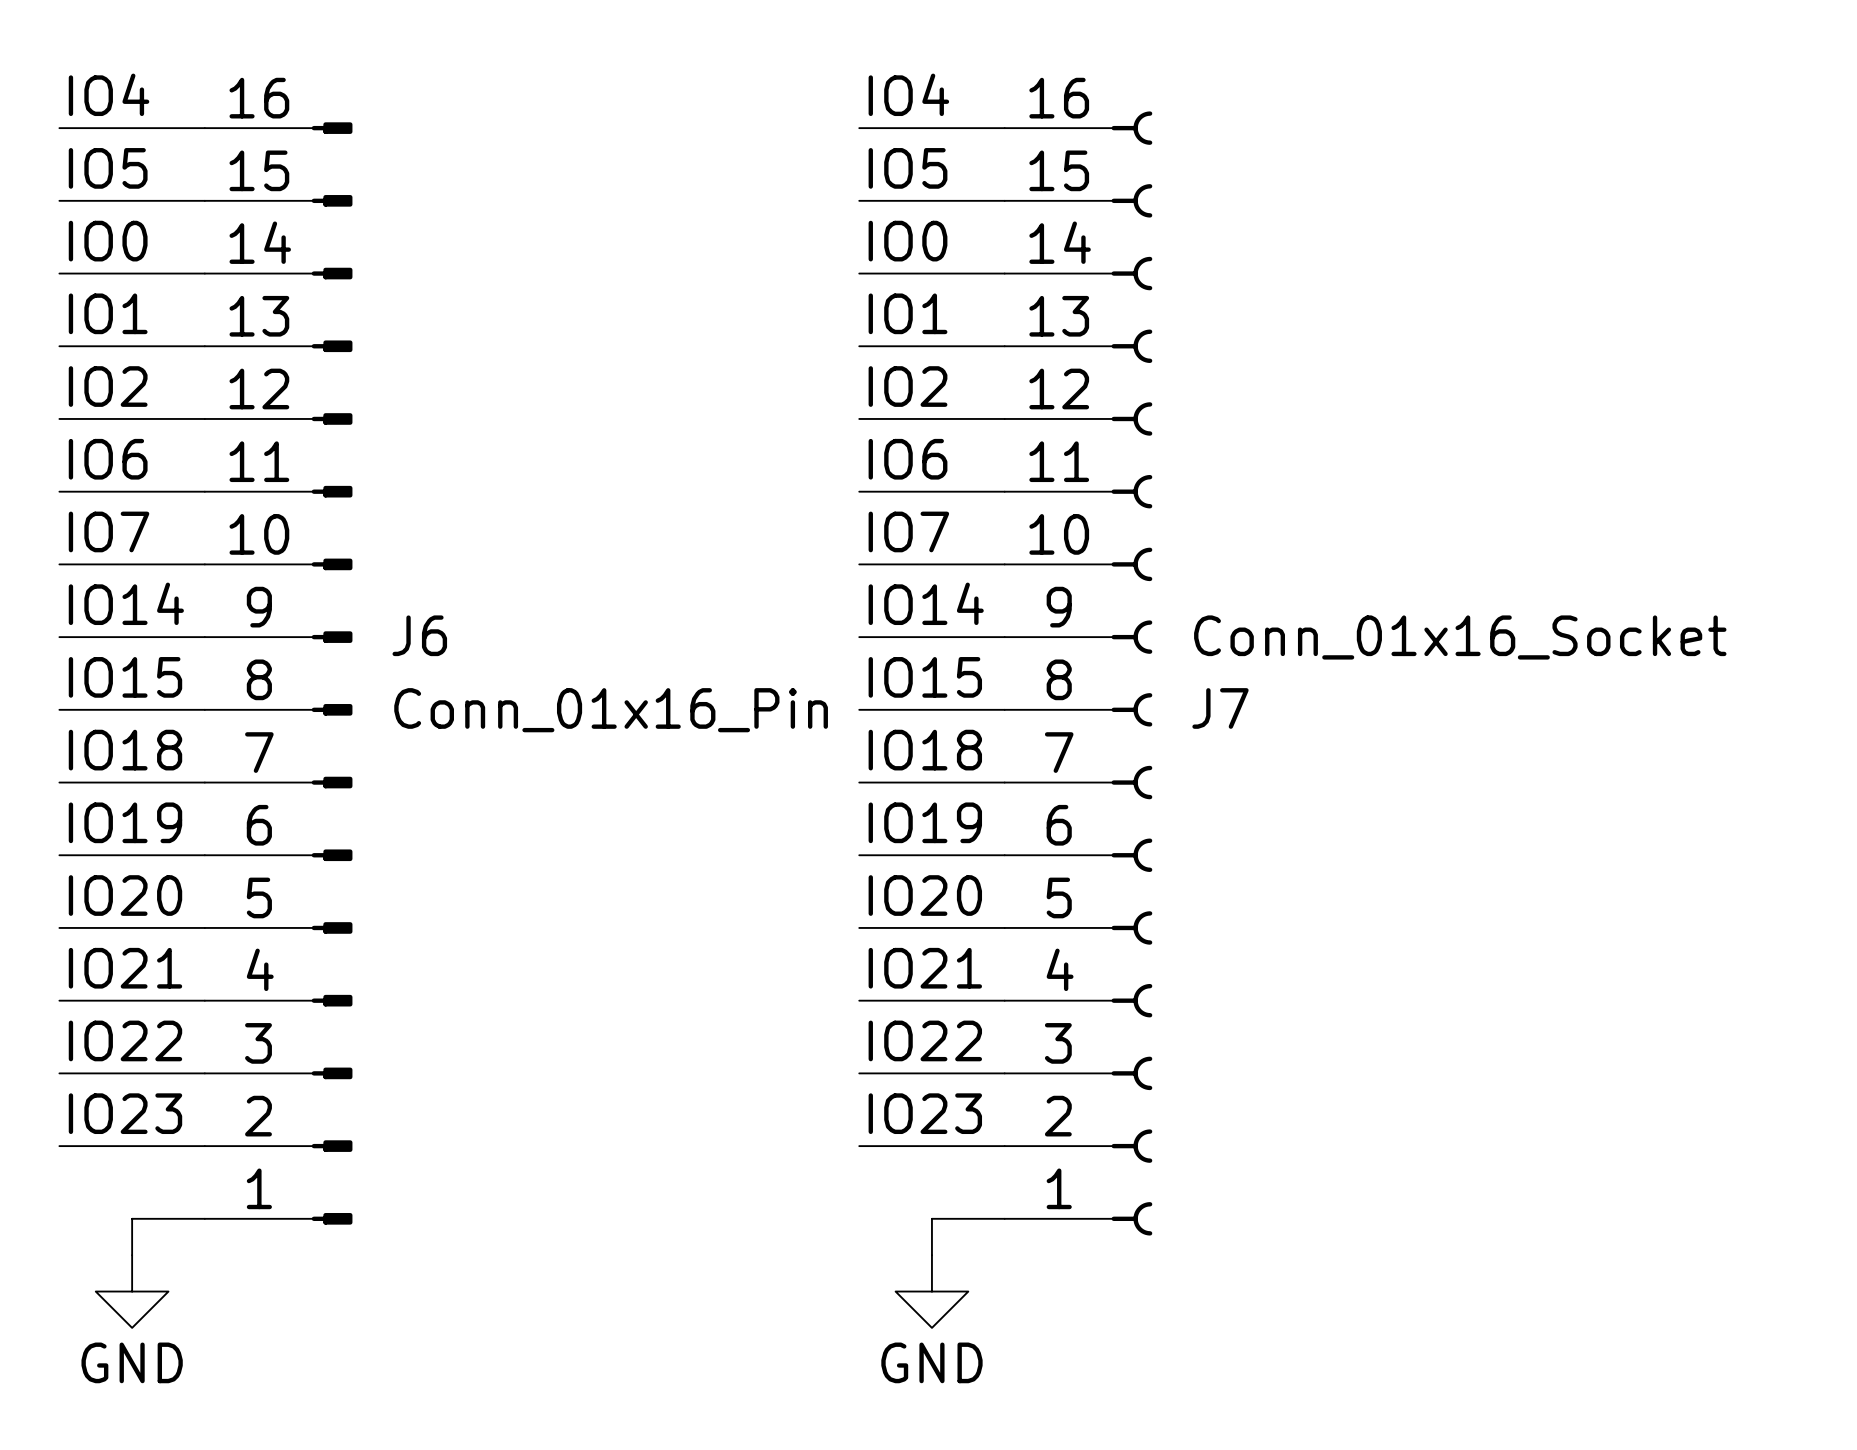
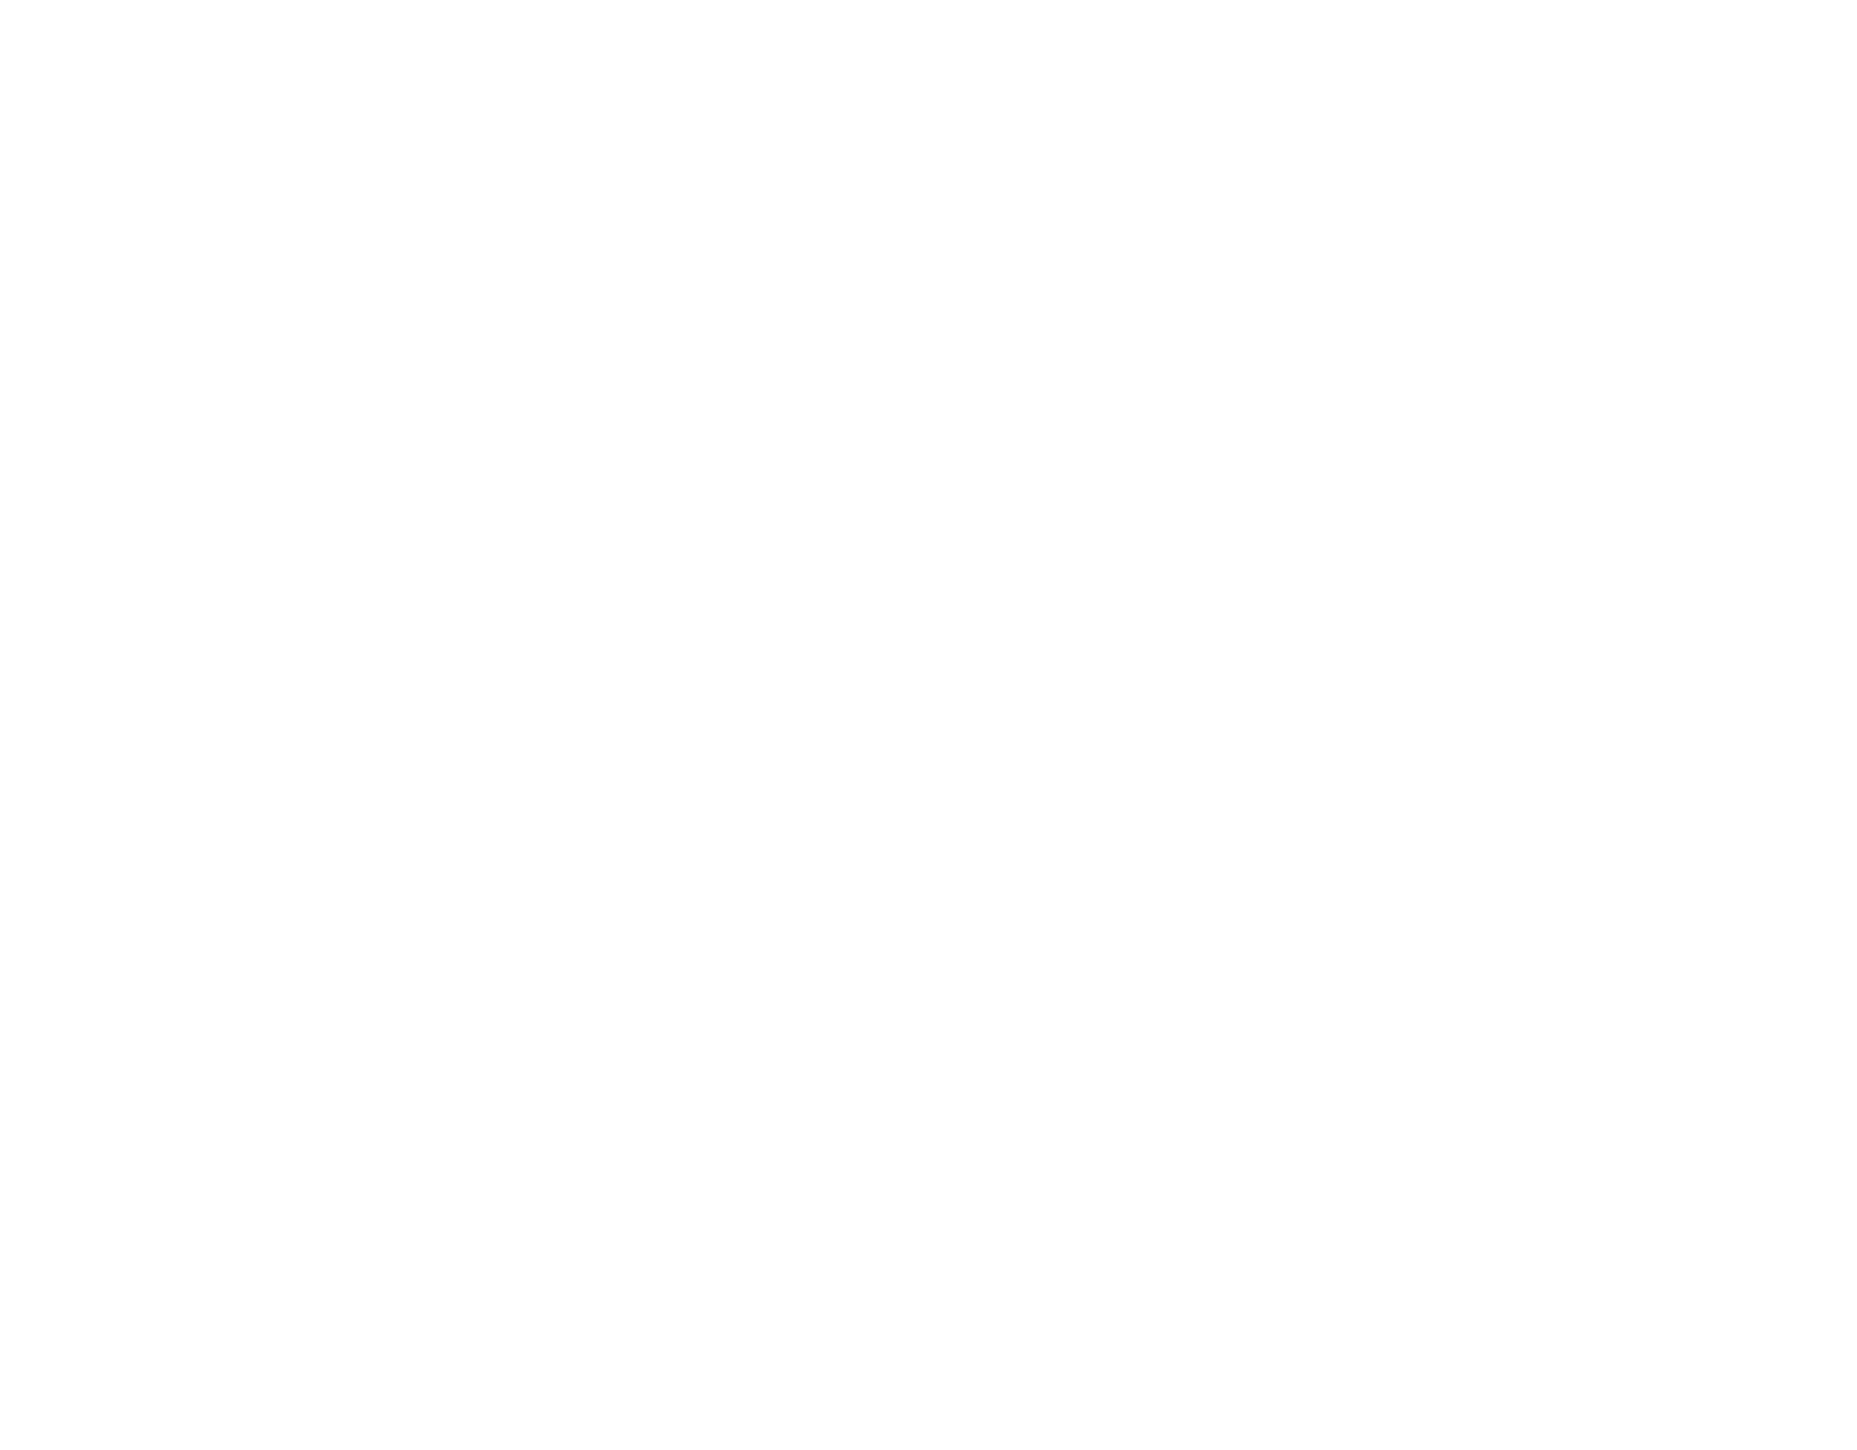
label: IO4 (109, 94) -> none
label: IO4 (908, 94) -> none
wire: (59, 128) (204, 128) -> none
wire: (859, 128) (1004, 128) -> none
label: IO5 (108, 168) -> none
label: IO5 (908, 168) -> none
wire: (59, 200) (204, 200) -> none
wire: (859, 200) (1004, 200) -> none
label: IO0 (108, 241) -> none
label: IO0 (908, 241) -> none
wire: (59, 273) (204, 273) -> none
wire: (859, 273) (1004, 273) -> none
label: IO1 (108, 313) -> none
label: IO1 (908, 313) -> none
wire: (59, 346) (204, 346) -> none
wire: (859, 346) (1004, 346) -> none
label: IO2 (108, 386) -> none
label: IO2 (908, 386) -> none
wire: (59, 418) (204, 418) -> none
wire: (859, 418) (1004, 418) -> none
label: IO6 (108, 459) -> none
label: IO6 (908, 459) -> none
wire: (59, 491) (204, 491) -> none
wire: (859, 491) (1004, 491) -> none
label: IO7 (109, 531) -> none
label: IO7 (908, 531) -> none
wire: (59, 564) (204, 564) -> none
wire: (859, 564) (1004, 564) -> none
label: IO14 (126, 603) -> none
label: IO14 (926, 603) -> none
wire: (59, 637) (204, 637) -> none
wire: (859, 637) (1004, 637) -> none
J6: Conn_01x16_Pin (278, 673) -> none
J7: Conn_01x16_Socket (1078, 673) -> none
label: IO15 (125, 677) -> none
label: IO15 (925, 677) -> none
wire: (59, 709) (204, 709) -> none
wire: (859, 709) (1004, 709) -> none
label: IO18 (125, 750) -> none
label: IO18 (925, 750) -> none
wire: (59, 782) (204, 782) -> none
wire: (859, 782) (1004, 782) -> none
label: IO19 (125, 822) -> none
label: IO19 (925, 822) -> none
wire: (59, 855) (204, 855) -> none
wire: (859, 855) (1004, 855) -> none
label: IO20 (125, 895) -> none
label: IO20 (925, 895) -> none
wire: (59, 927) (204, 927) -> none
wire: (859, 927) (1004, 927) -> none
label: IO21 (125, 968) -> none
label: IO21 (925, 968) -> none
wire: (59, 1000) (204, 1000) -> none
wire: (859, 1000) (1004, 1000) -> none
label: IO22 (125, 1040) -> none
label: IO22 (925, 1040) -> none
wire: (59, 1073) (204, 1073) -> none
wire: (859, 1073) (1004, 1073) -> none
label: IO23 (125, 1113) -> none
label: IO23 (925, 1113) -> none
wire: (59, 1146) (204, 1146) -> none
wire: (859, 1146) (1004, 1146) -> none
wire: (204, 1218) (132, 1218) (132, 1255) -> none
wire: (1004, 1218) (931, 1218) (931, 1255) -> none
power symbol: GND (132, 1291) -> none
power symbol: GND (931, 1291) -> none

